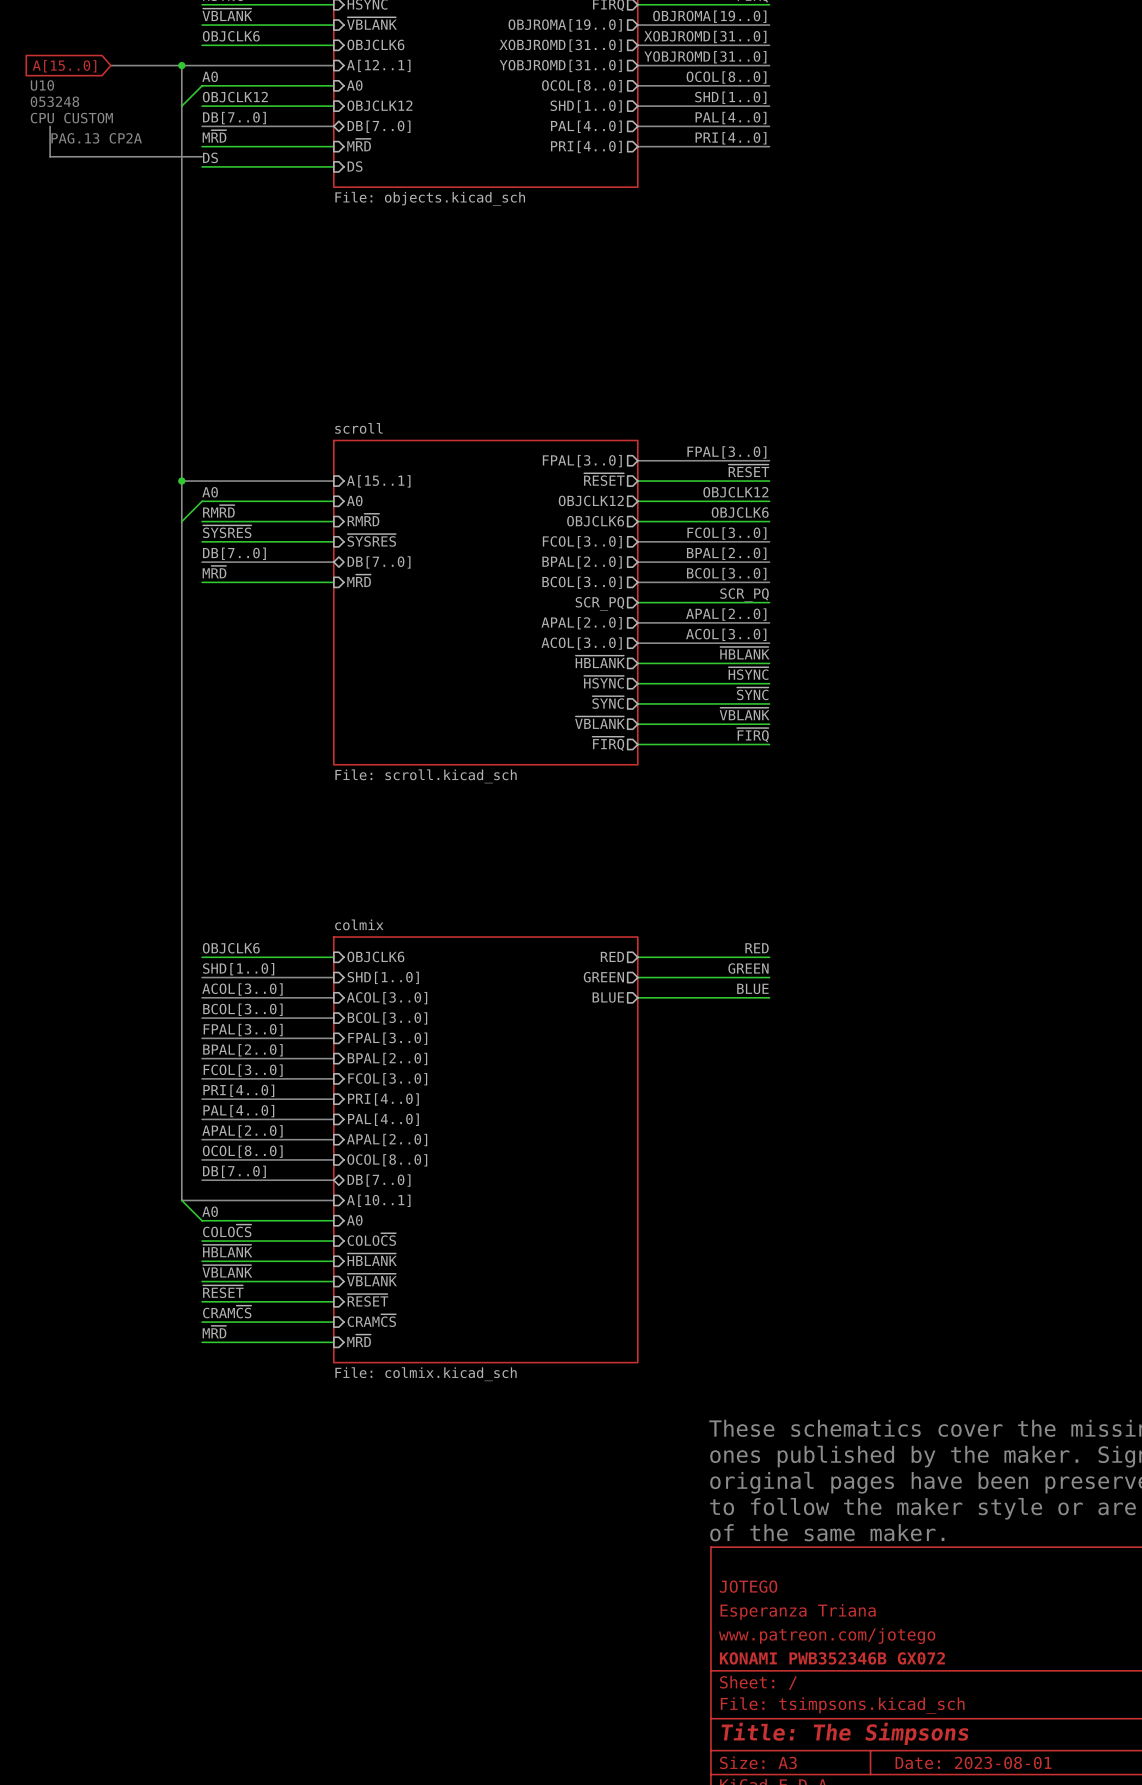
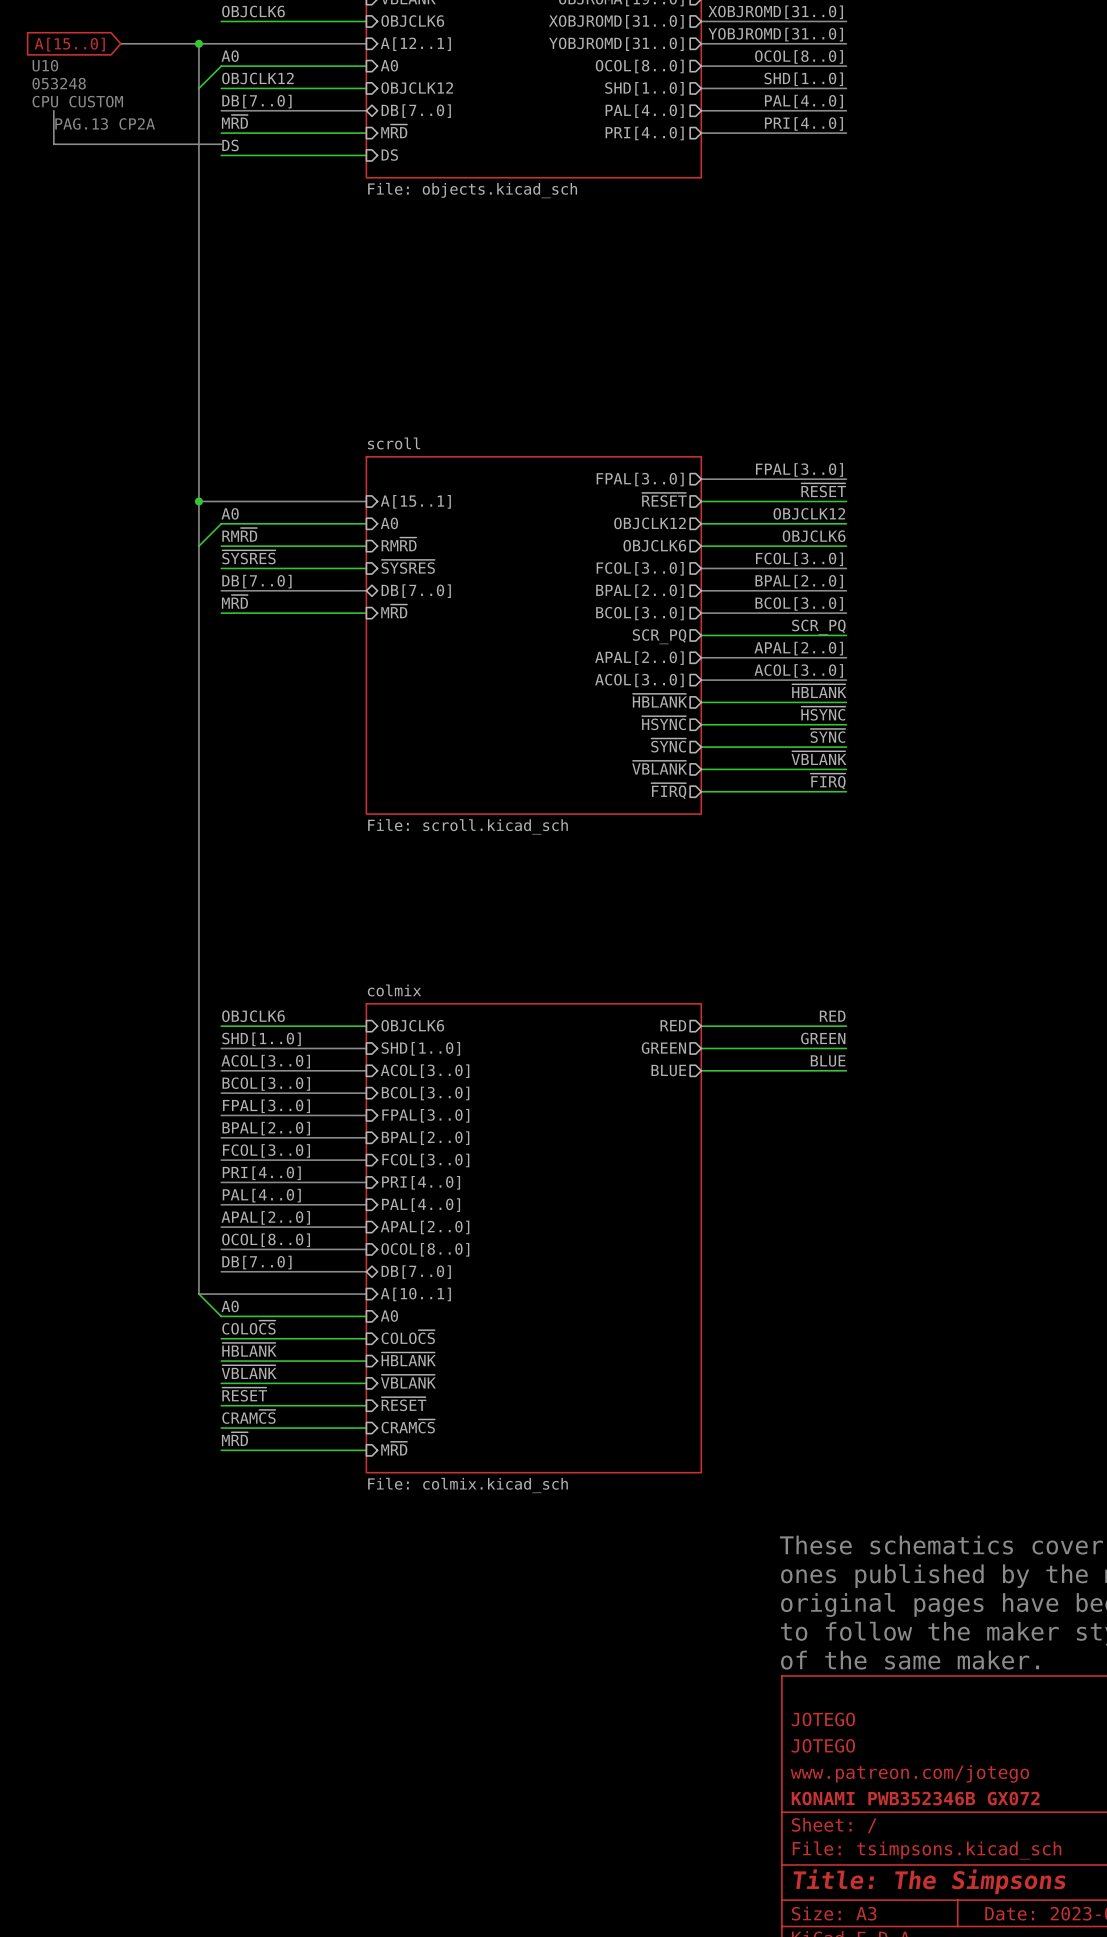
title block: Esperanza Triana (798, 1612) -> JOTEGO (823, 1745)

